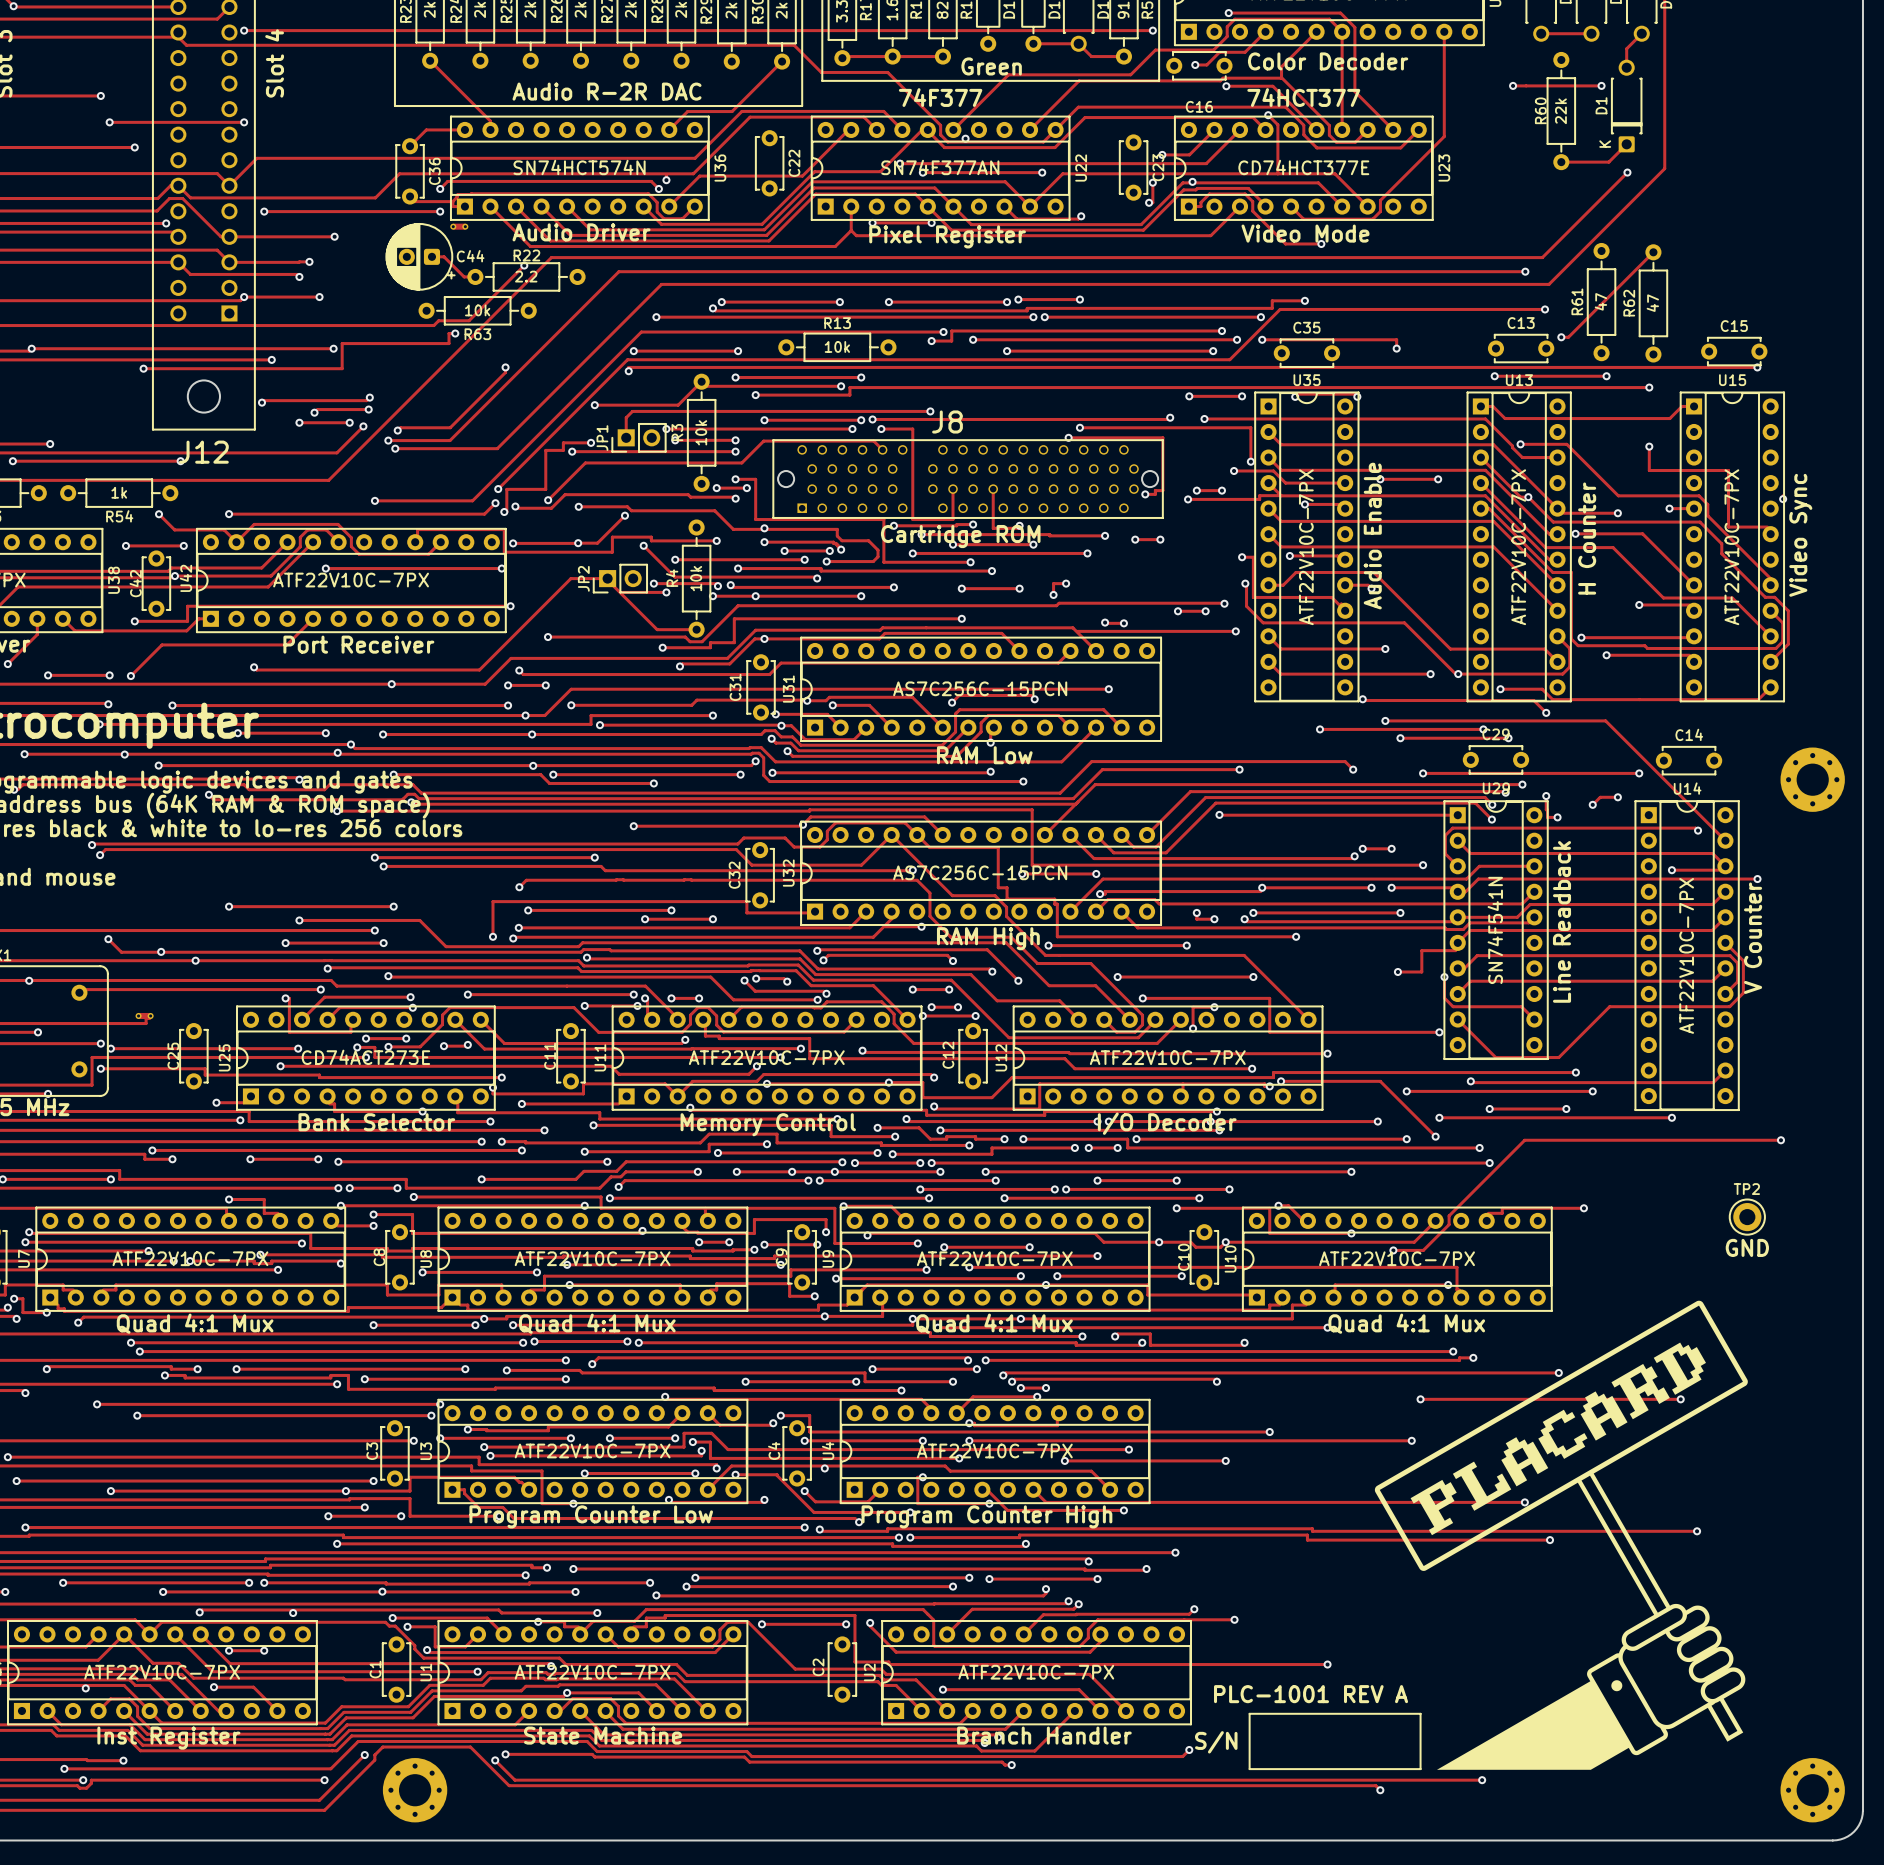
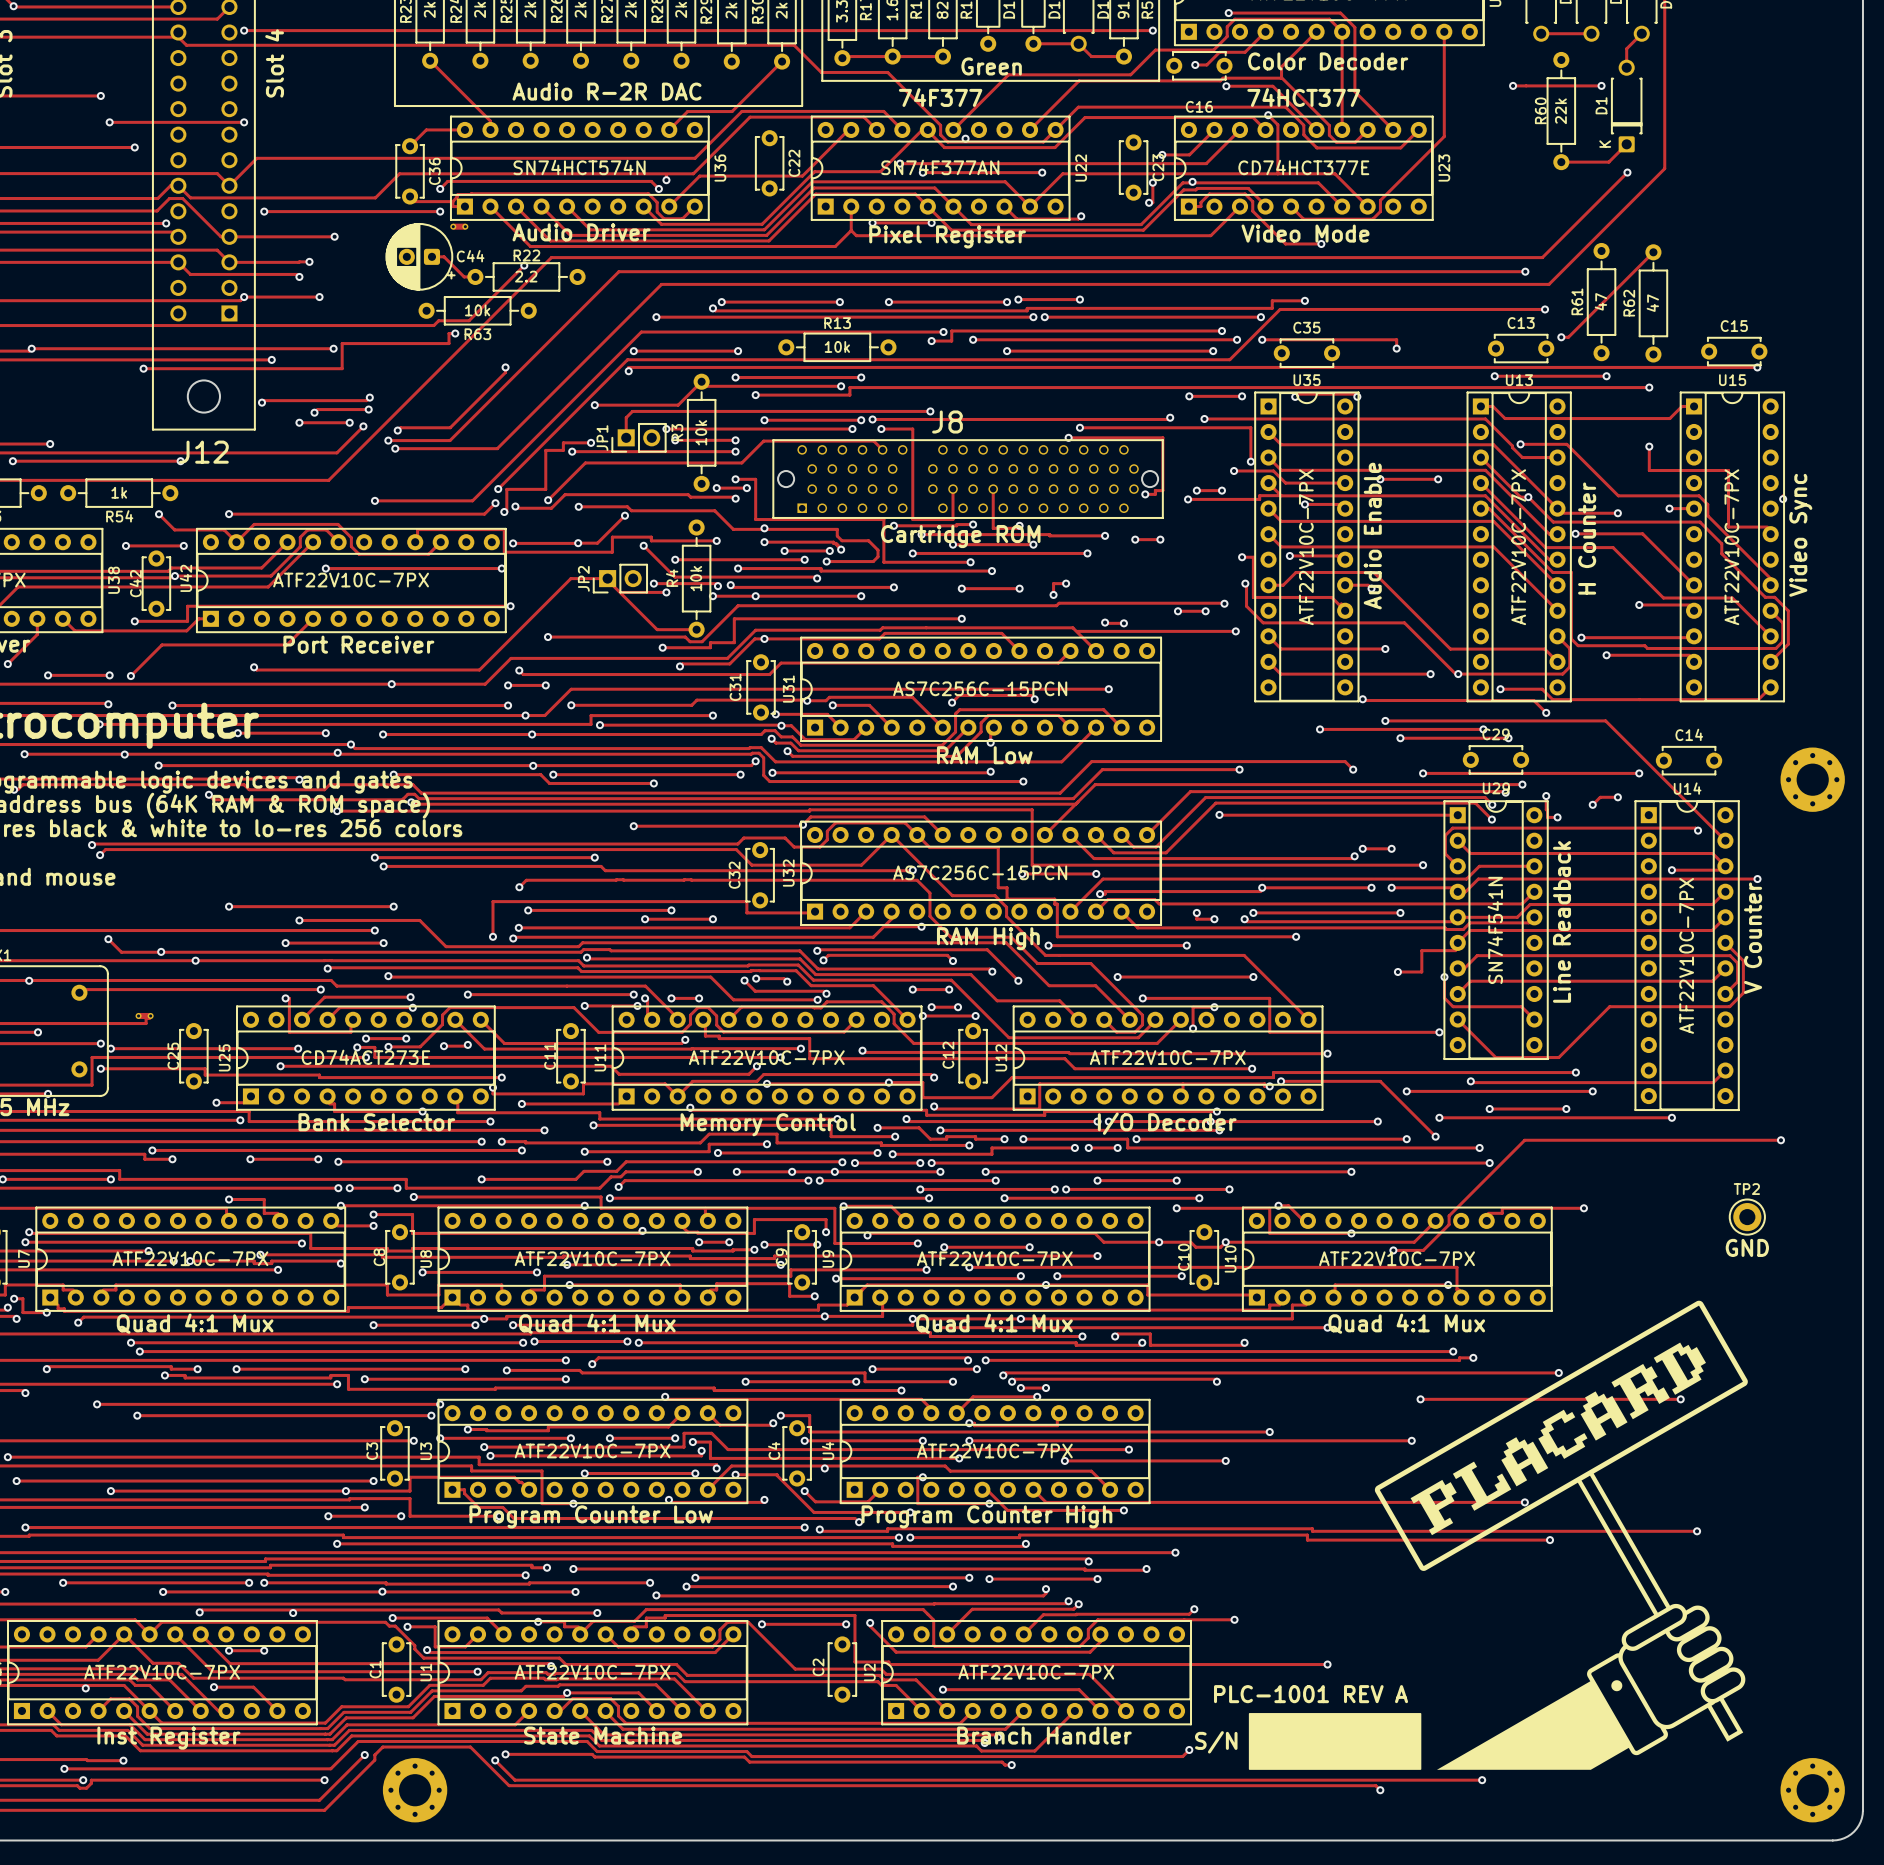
drawing: none -> [1248, 1713, 1422, 1770]
line: (1249, 1713) (1420, 1713) (1420, 1769) (1249, 1769) (1249, 1713) -> none

